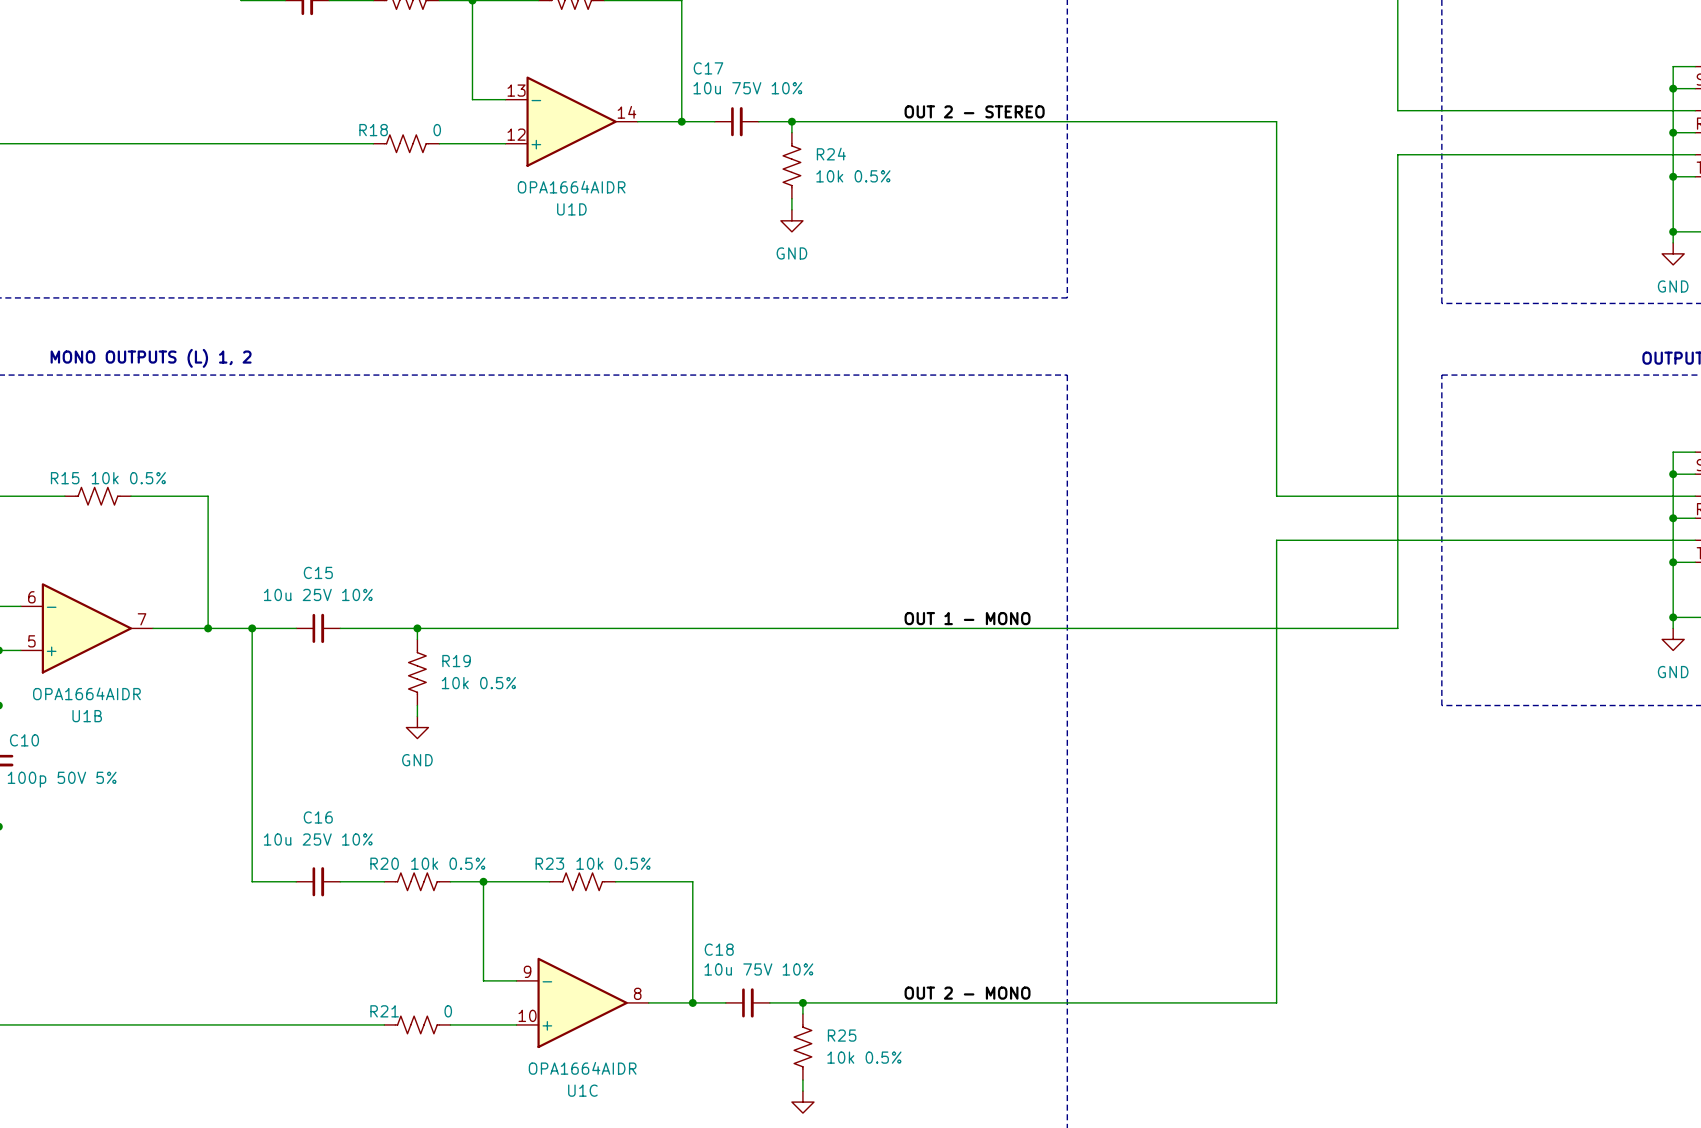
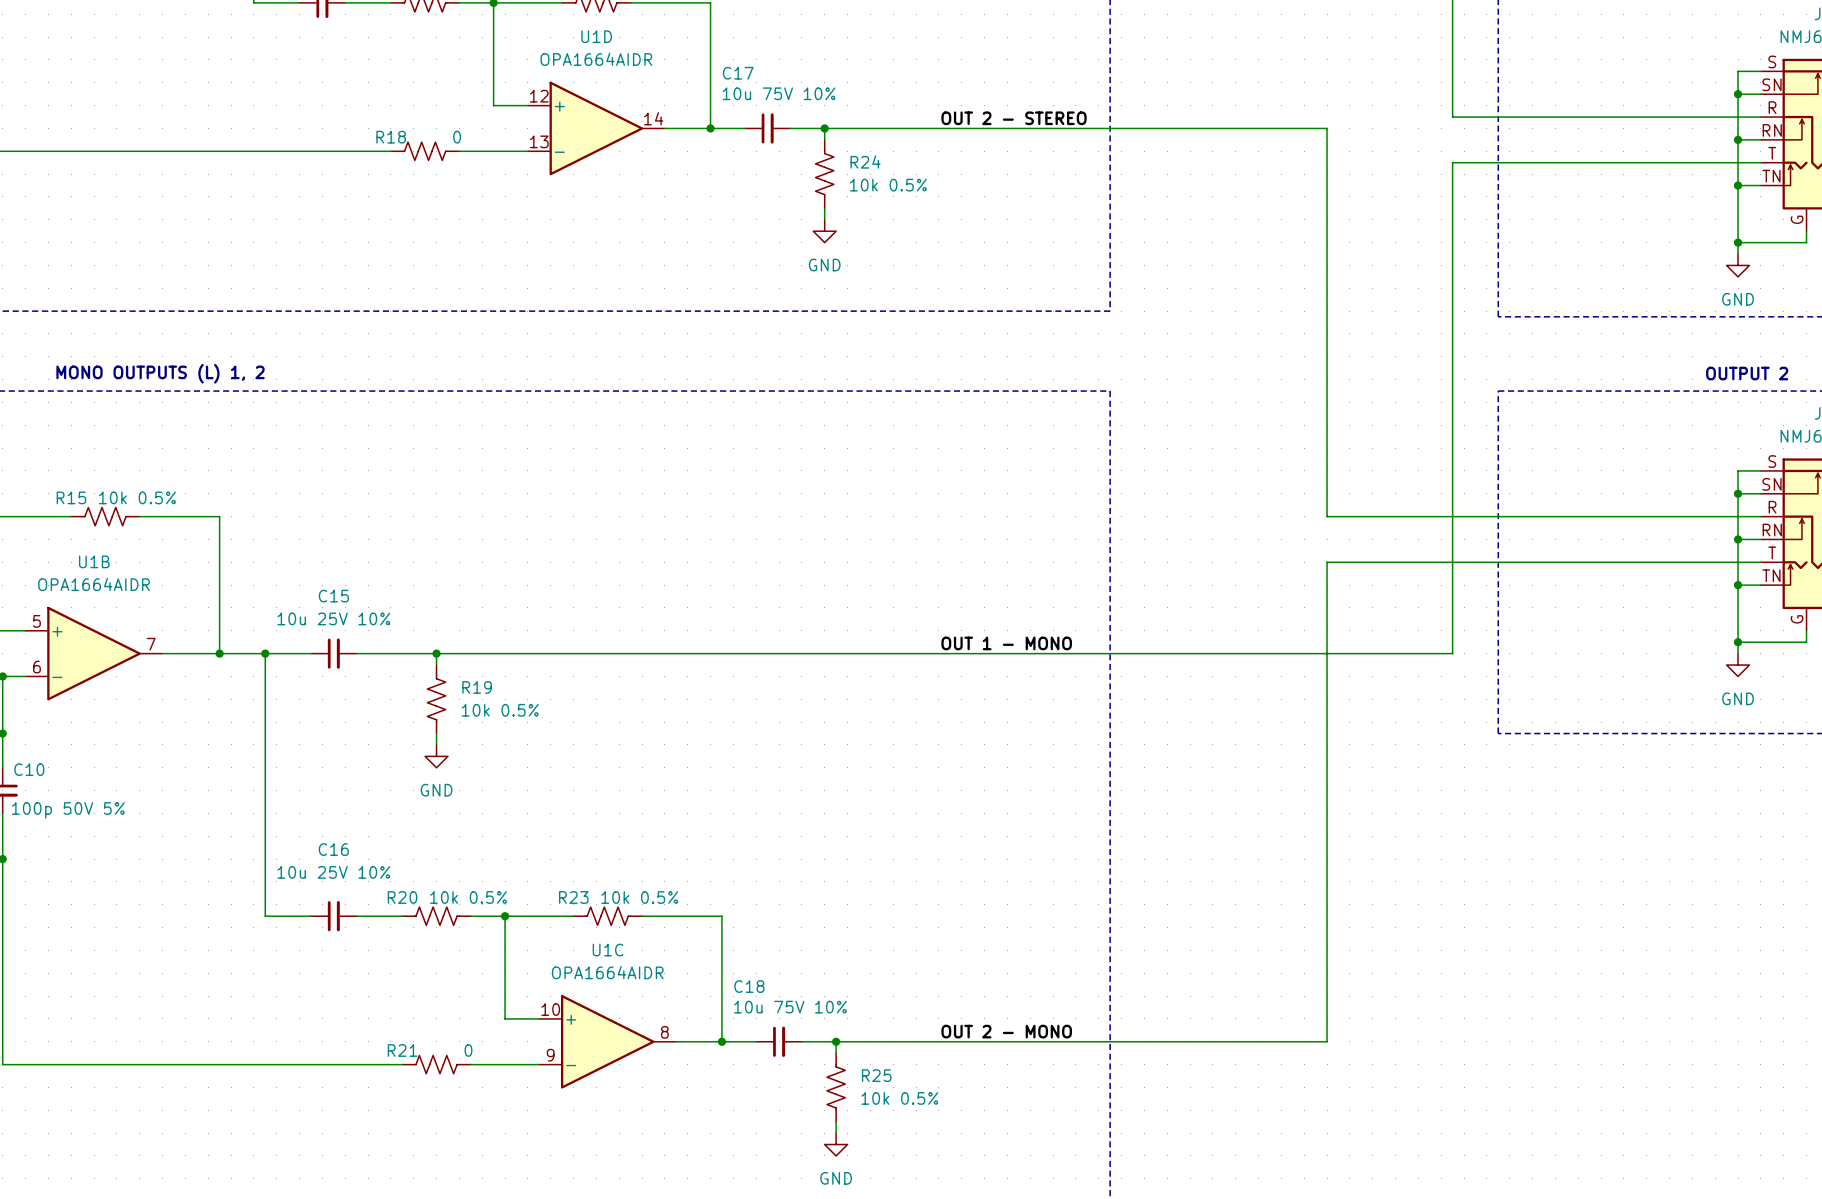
U1D flip: as is (571, 121) -> up-down (596, 128)
U1B flip: as is (86, 628) -> up-down (94, 653)
U1C flip: as is (582, 1002) -> up-down (607, 1041)

